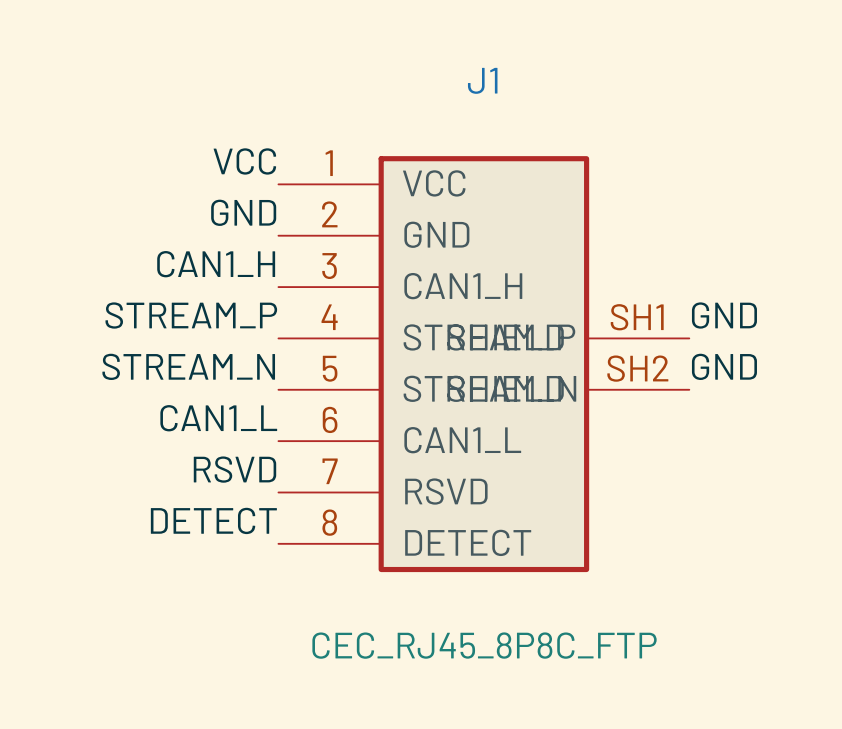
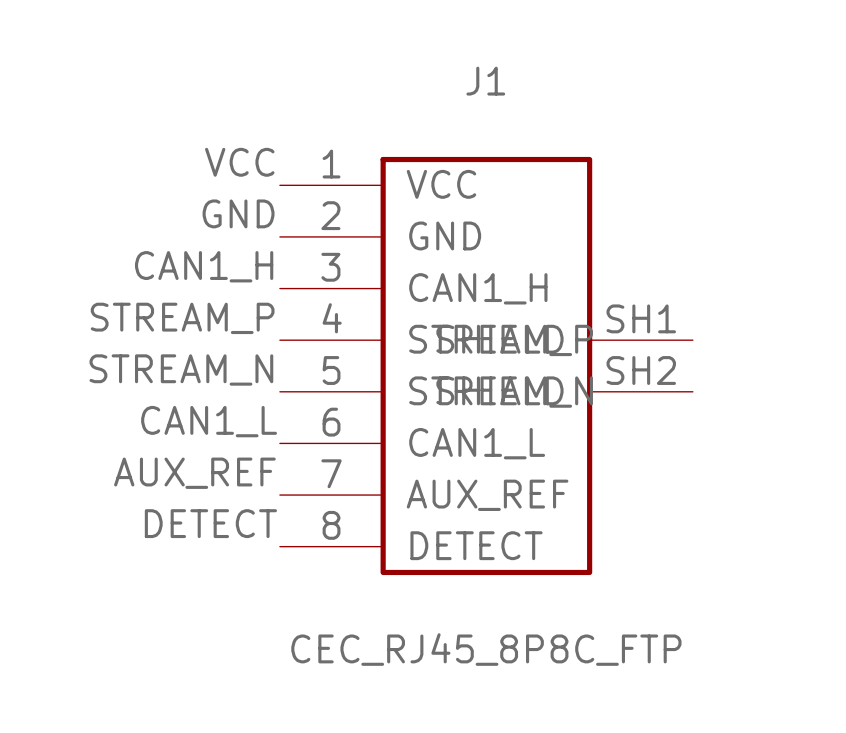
label: GND (724, 315) -> none
label: GND (724, 366) -> none
label: RSVD (234, 469) -> AUX_REF (194, 473)
J1 pin name: RSVD (446, 491) -> AUX_REF (487, 495)

